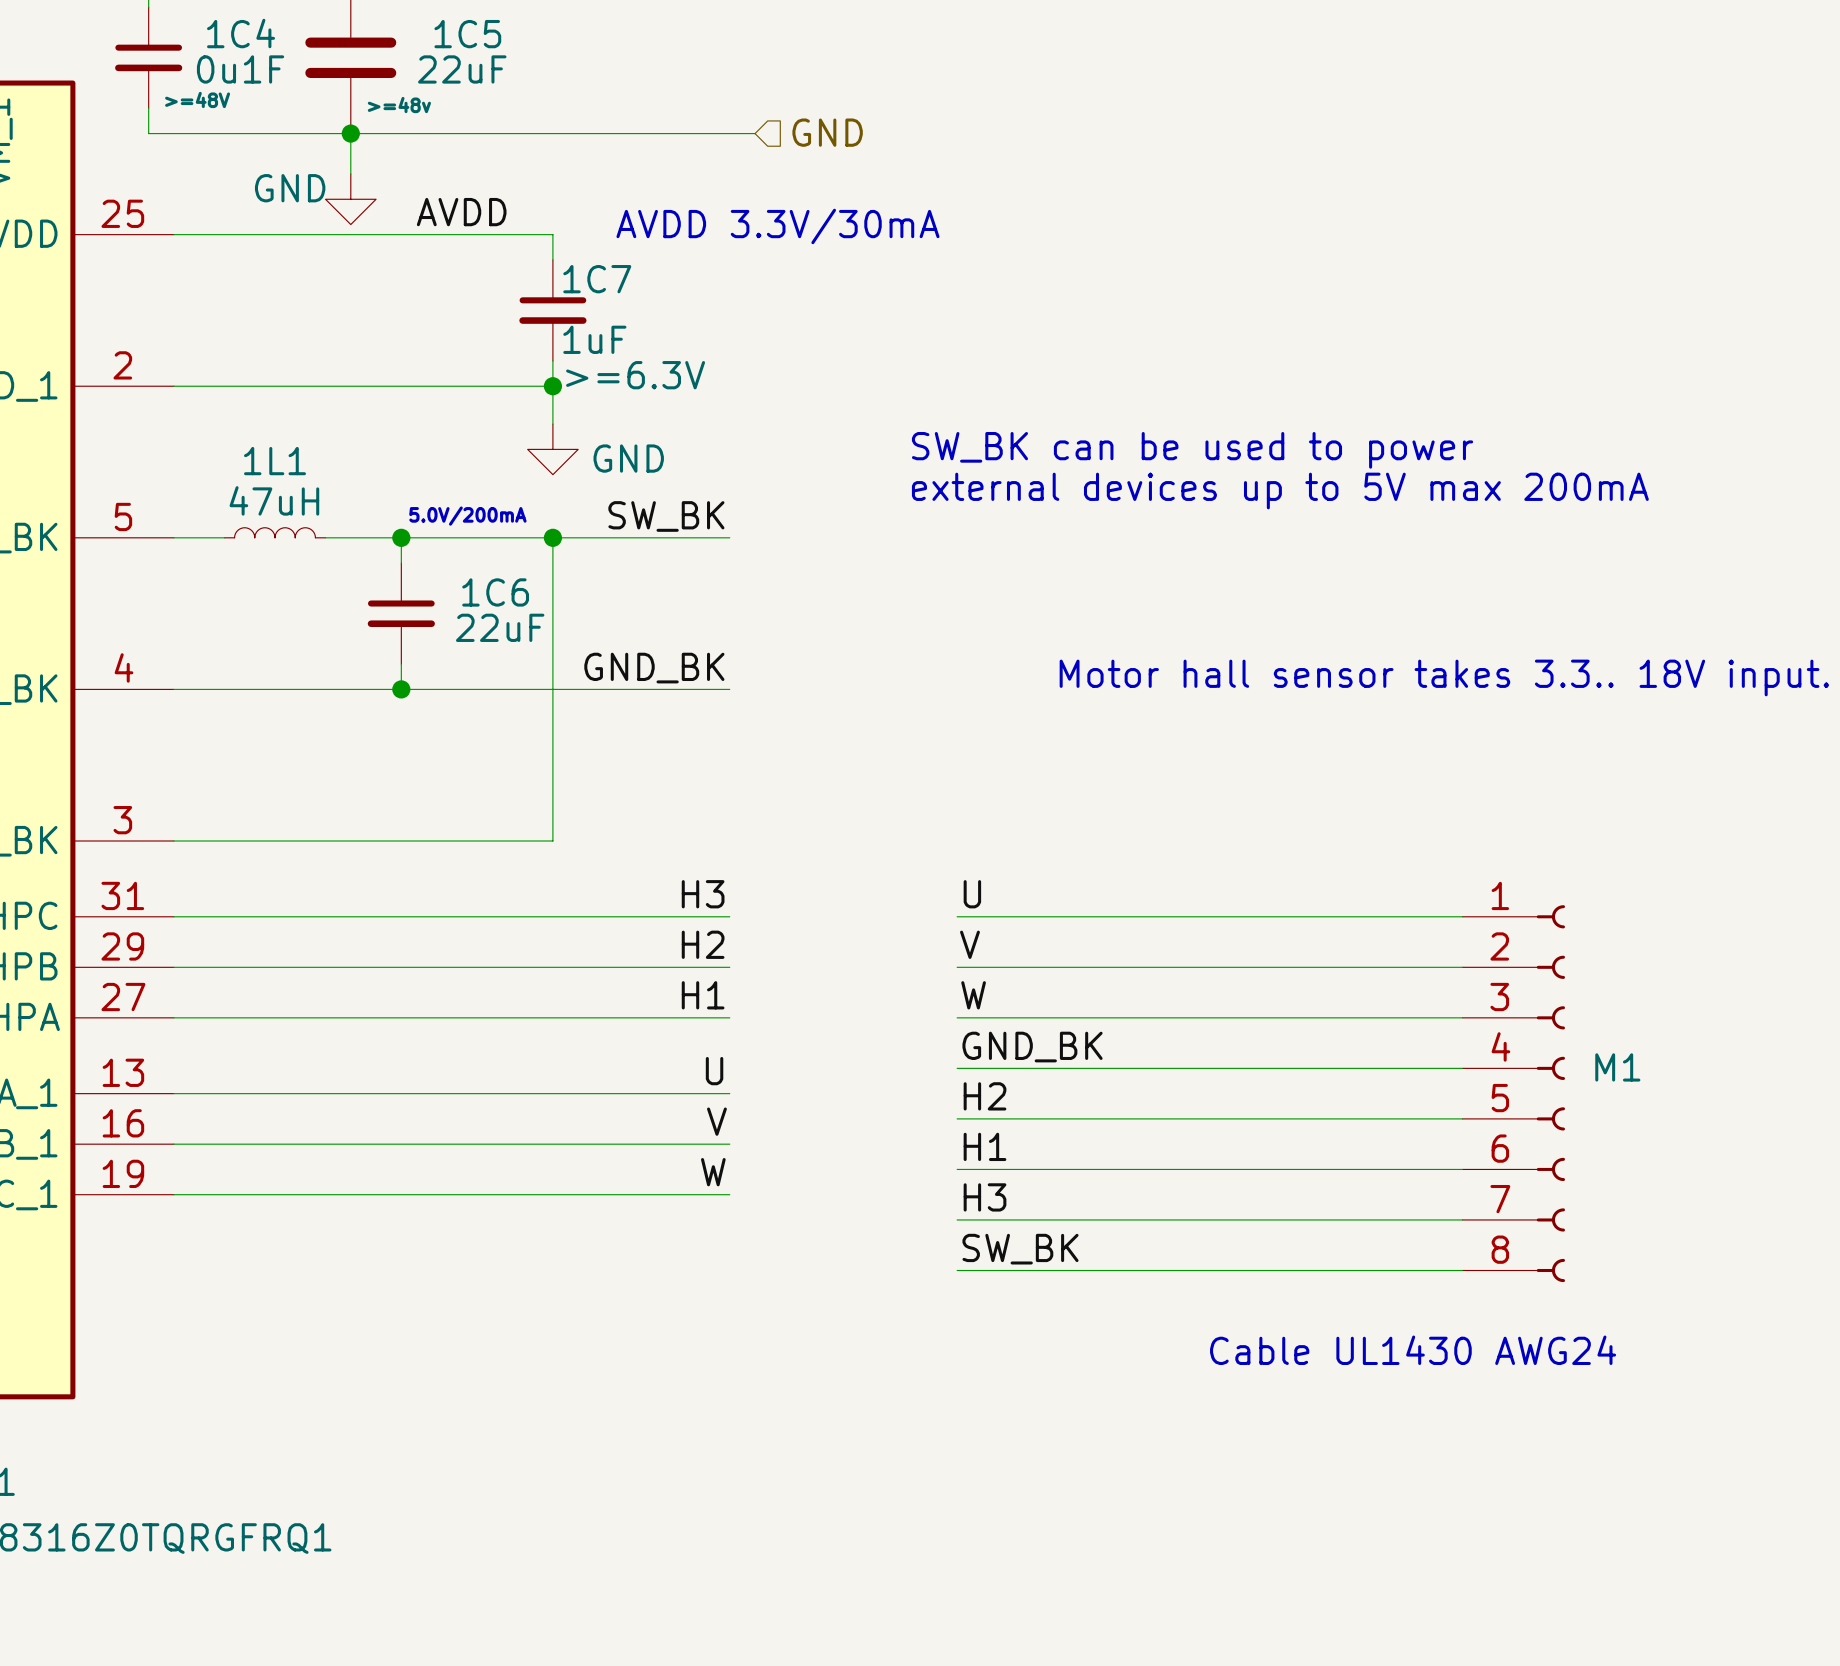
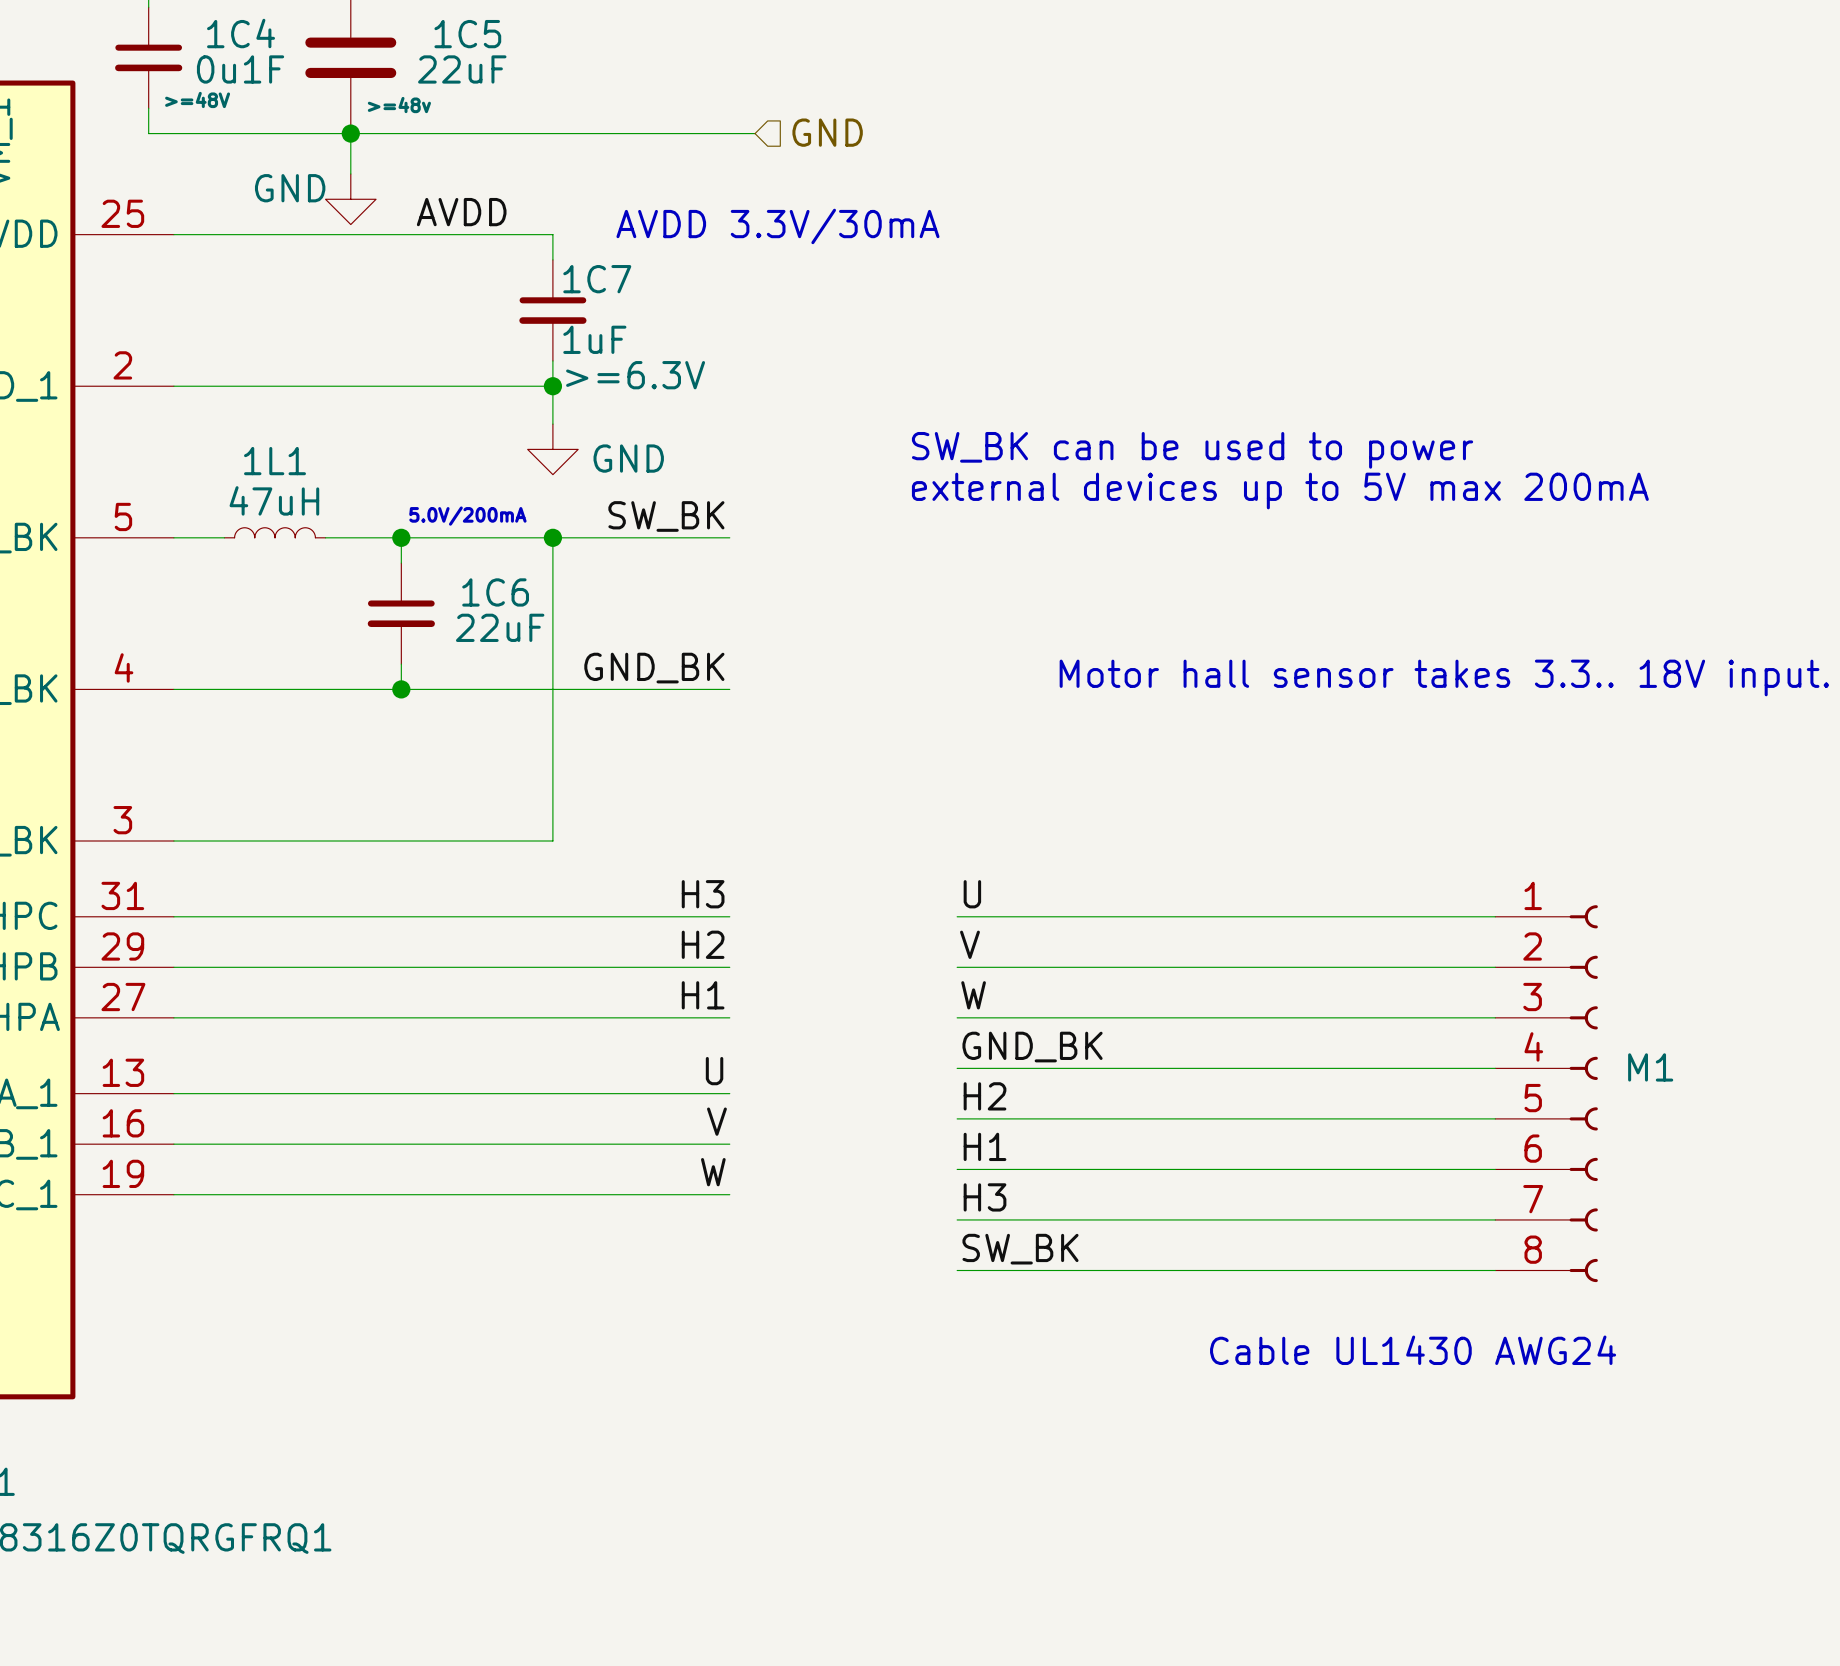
M1 position: (1513, 1093) -> (1546, 1093)

